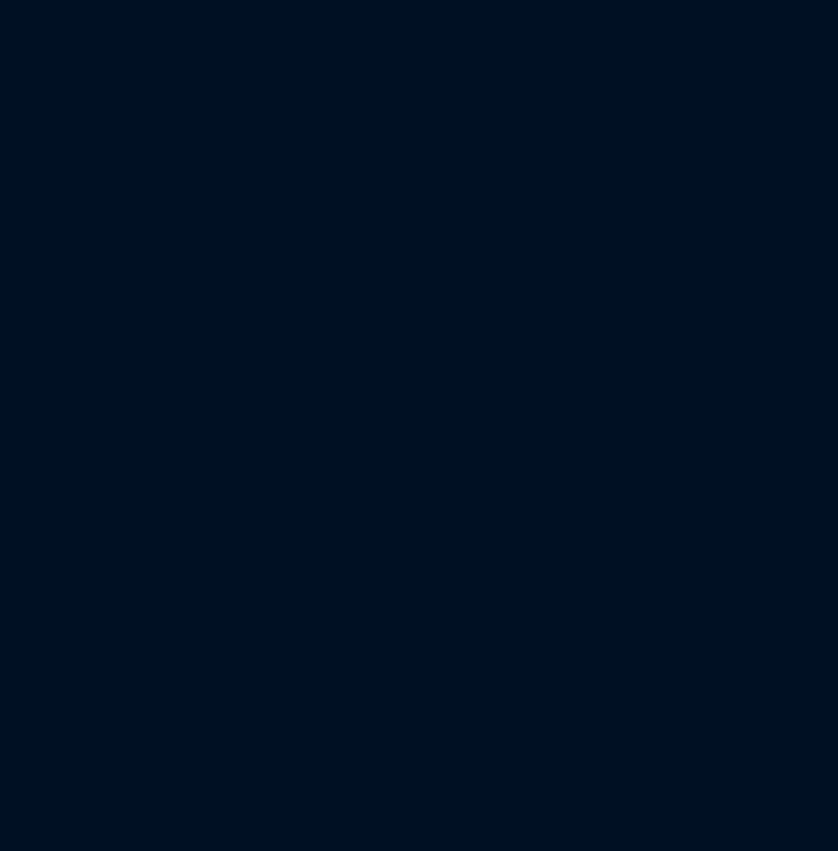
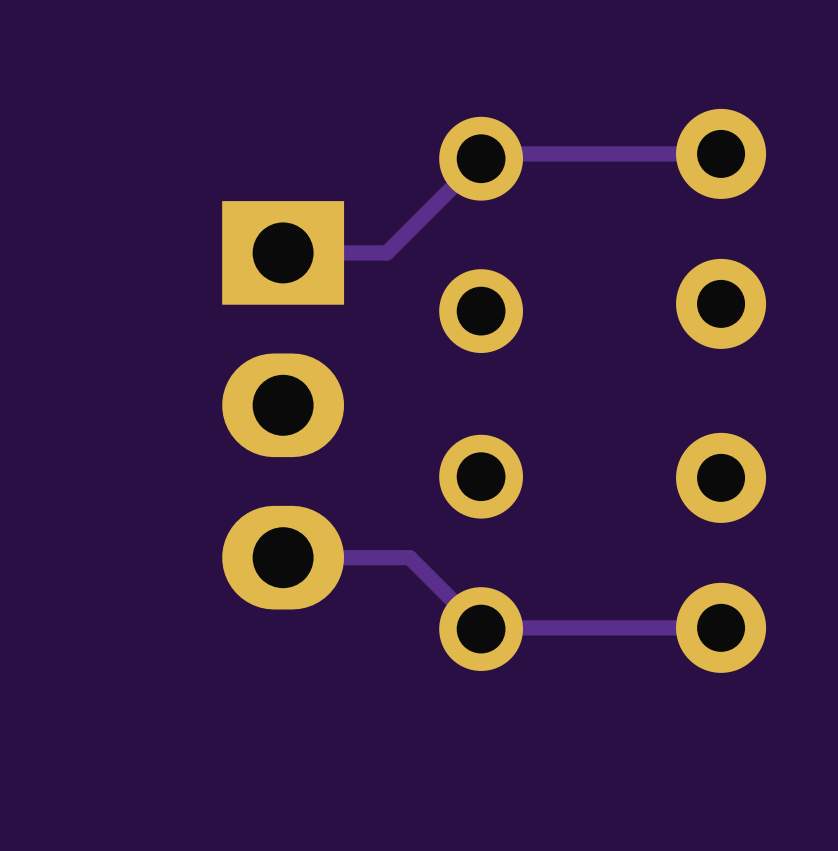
track: none -> (721, 153) (485, 153) (386, 252) (283, 252)
part: none -> (721, 228)
part: none -> (481, 234)
part: none -> (283, 405)
part: none -> (481, 552)
part: none -> (721, 552)
track: none -> (283, 557) (409, 557) (479, 627) (721, 627)

